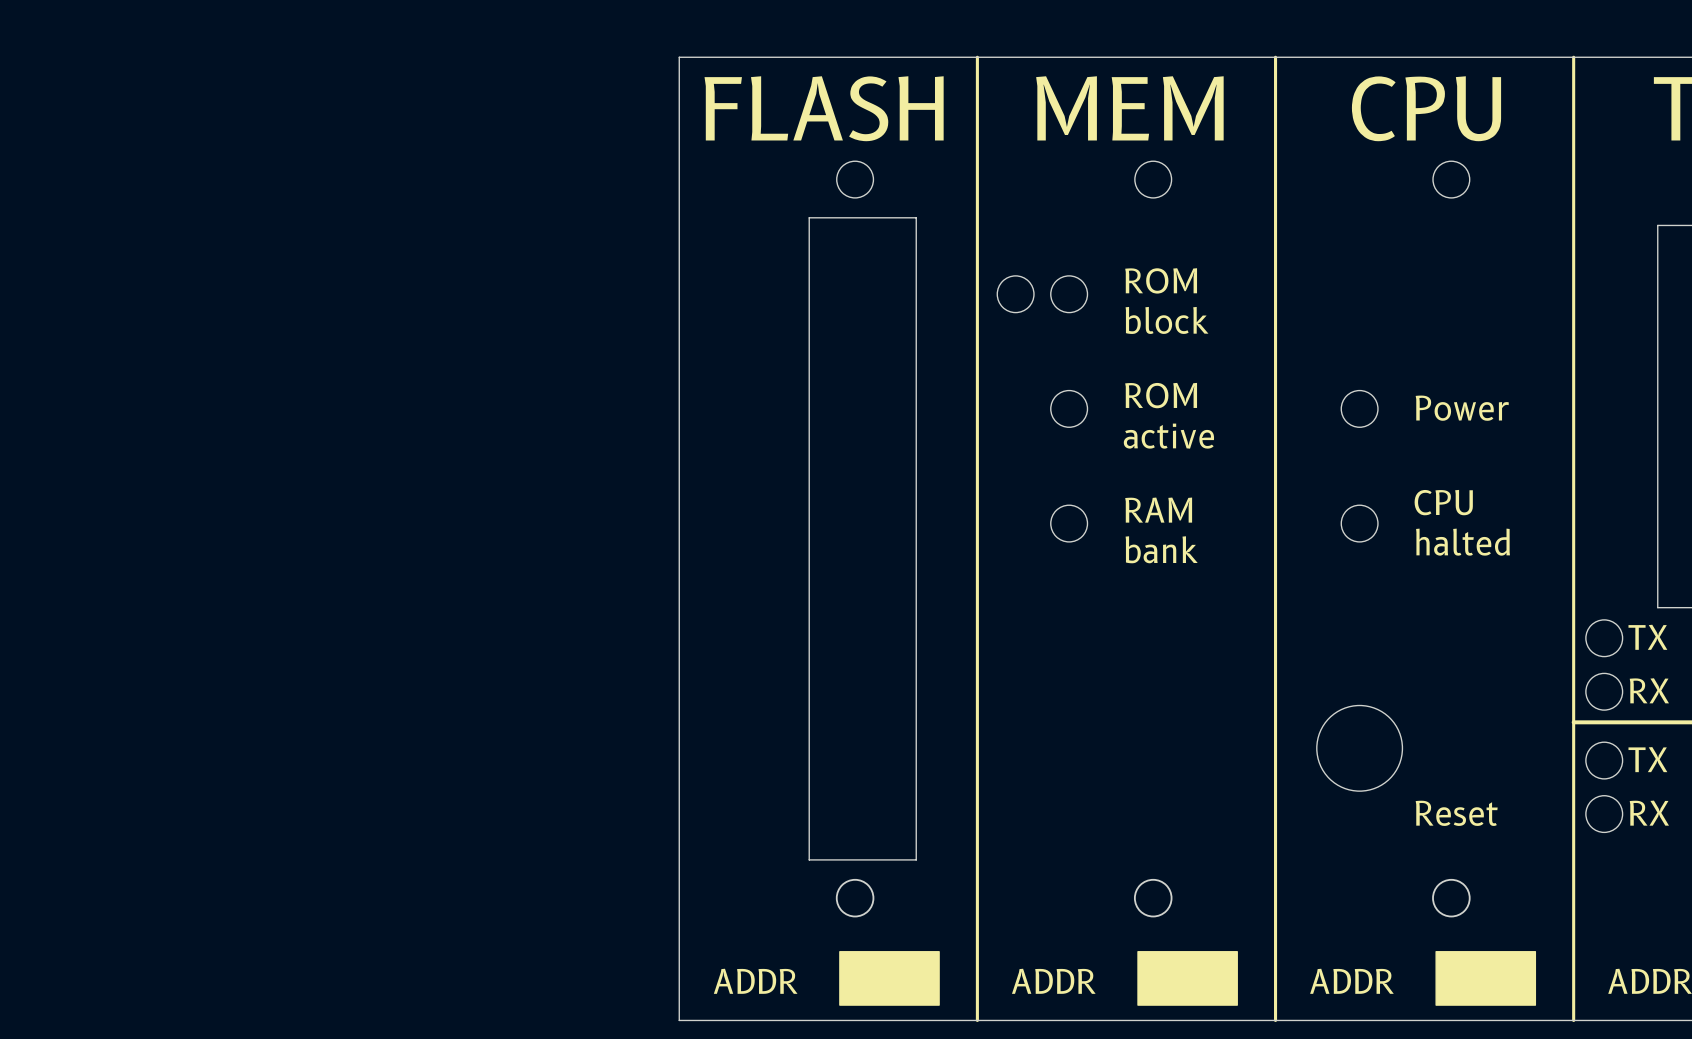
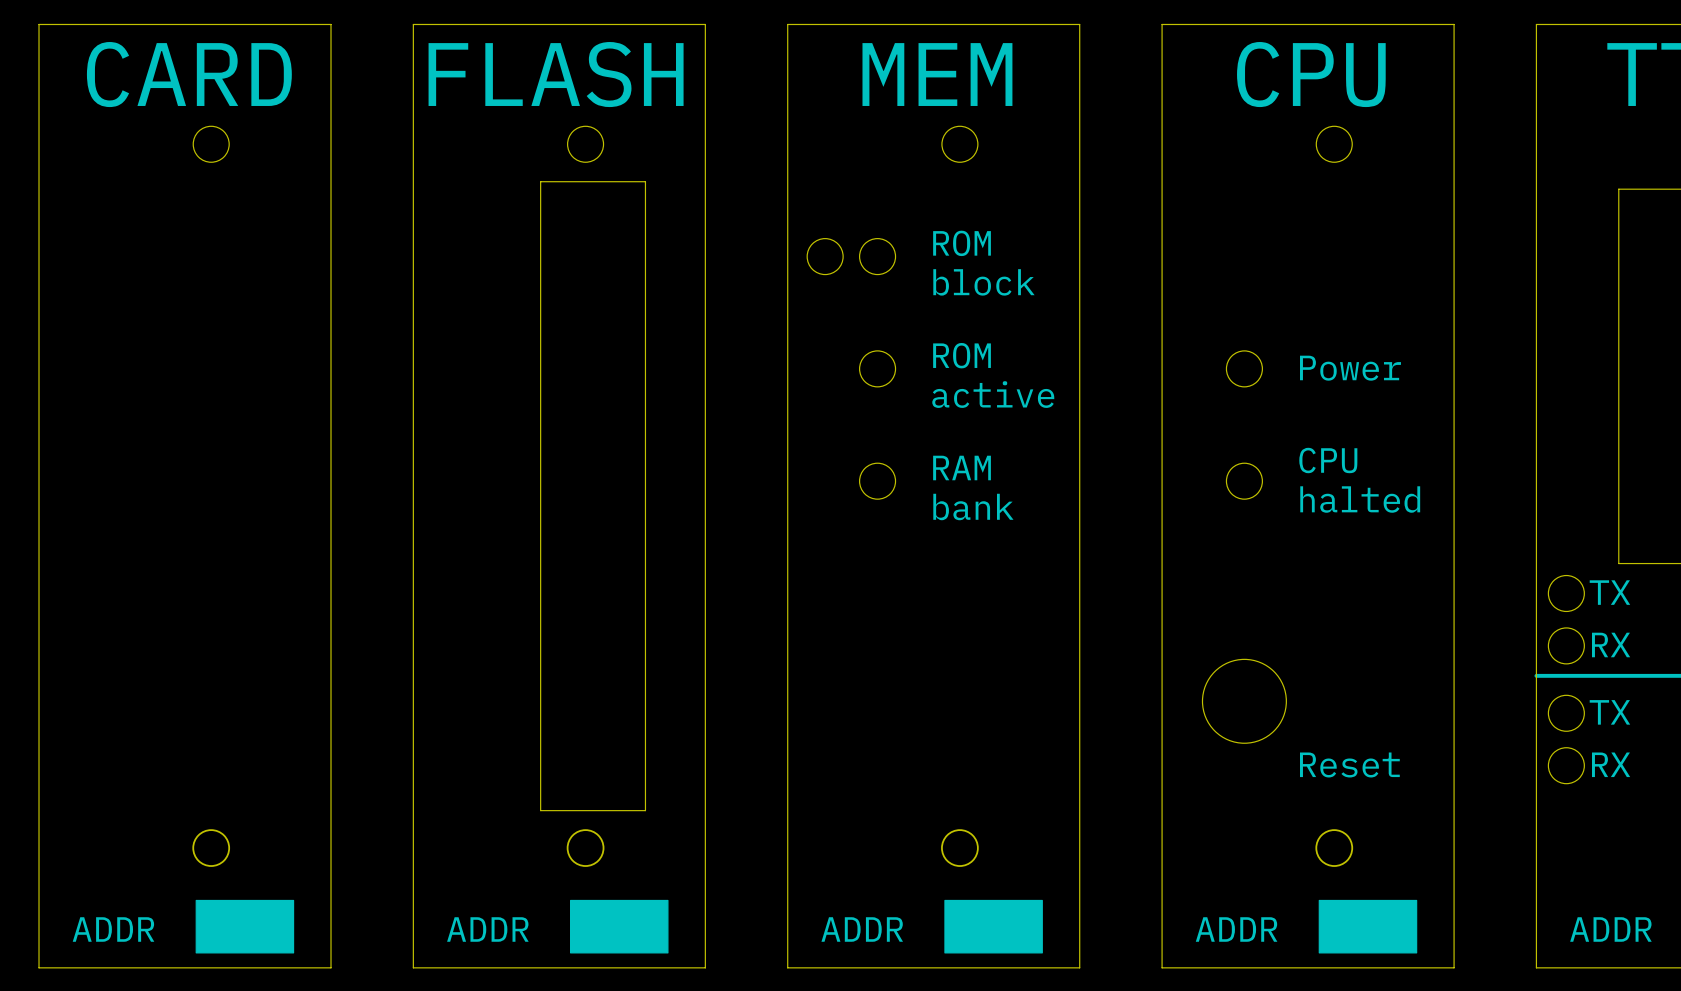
board edge: none -> (39, 24) (331, 24) (331, 967) (39, 967) (39, 24)
board edge: (679, 57) (679, 1020) -> (660, 24) (413, 24) (413, 967) (660, 967)
board edge: (725, 57) (809, 57) -> (787, 181) (787, 24)
board edge: none -> (705, 24) (705, 967)
line: (977, 57) (977, 1020) -> none
board edge: (1107, 57) (1191, 57) -> (1079, 24) (1079, 967)
line: (1275, 57) (1275, 1020) -> none
board edge: (1489, 57) (1573, 57) -> (1454, 24) (1454, 967)
line: (1573, 57) (1573, 1020) -> none
text: none -> CARD (189, 74)
text position: FLASH (824, 108) -> FLASH (556, 74)
text position: MEM (1129, 108) -> MEM (937, 74)
text position: CPU (1426, 108) -> CPU (1311, 74)
round board edge: none -> [192, 126, 230, 163]
round board edge: none -> [567, 126, 604, 163]
round board edge: [836, 160, 874, 199] -> none
round board edge: none -> [941, 126, 979, 163]
round board edge: [1134, 160, 1172, 199] -> none
round board edge position: (1451, 179) -> (1334, 144)
board edge: none -> (540, 181) (540, 810) (645, 810) (645, 181) (540, 181)
board edge: (809, 217) (916, 217) (916, 859) (809, 859) -> none
round board edge: none -> [806, 238, 844, 275]
round board edge: none -> [859, 238, 896, 275]
round board edge: [996, 275, 1035, 313] -> none
round board edge: [1050, 275, 1088, 313] -> none
text: none -> ROM (962, 243)
text: ROM (1161, 280) -> none
text position: block (1167, 320) -> block (983, 282)
round board edge: none -> [859, 350, 896, 388]
round board edge: [1050, 390, 1088, 428] -> none
round board edge: none -> [1226, 350, 1263, 388]
round board edge: [1340, 390, 1379, 428] -> none
text: none -> ROM (962, 355)
text: ROM (1161, 395) -> none
text position: Power (1462, 408) -> Power (1350, 368)
text position: active (1168, 436) -> active (993, 394)
text position: CPU (1443, 502) -> CPU (1328, 460)
round board edge: none -> [859, 462, 896, 500]
round board edge: [1050, 504, 1088, 543] -> none
round board edge: none -> [1226, 462, 1263, 500]
round board edge: [1340, 504, 1379, 543] -> none
text position: RAM (1158, 510) -> RAM (962, 467)
text position: halted (1463, 542) -> halted (1360, 499)
text position: bank (1161, 549) -> bank (973, 507)
round board edge position: (1359, 748) -> (1244, 701)
text position: Reset (1456, 813) -> Reset (1349, 764)
round board edge: none -> [192, 829, 231, 867]
round board edge: none -> [566, 829, 605, 867]
round board edge: [835, 878, 875, 918] -> none
round board edge: none -> [941, 829, 979, 867]
round board edge: [1133, 878, 1173, 918] -> none
round board edge position: (1451, 898) -> (1334, 848)
drawing: none -> [195, 899, 295, 954]
drawing: none -> [570, 899, 669, 954]
drawing: [839, 951, 940, 1006] -> none
drawing: none -> [944, 899, 1043, 954]
drawing: [1137, 951, 1238, 1006] -> none
drawing position: (1485, 978) -> (1367, 926)
text: none -> ADDR (113, 929)
text: none -> ADDR (487, 929)
text: ADDR (755, 981) -> none
text: none -> ADDR (862, 929)
text: ADDR (1053, 981) -> none
text position: ADDR (1351, 981) -> ADDR (1236, 929)
board edge: (725, 1020) (809, 1020) -> (787, 810) (787, 967)
board edge: (1107, 1020) (1191, 1020) -> (1162, 24) (1162, 967)
board edge: (1489, 1020) (1573, 1020) -> (1536, 24) (1536, 967)

